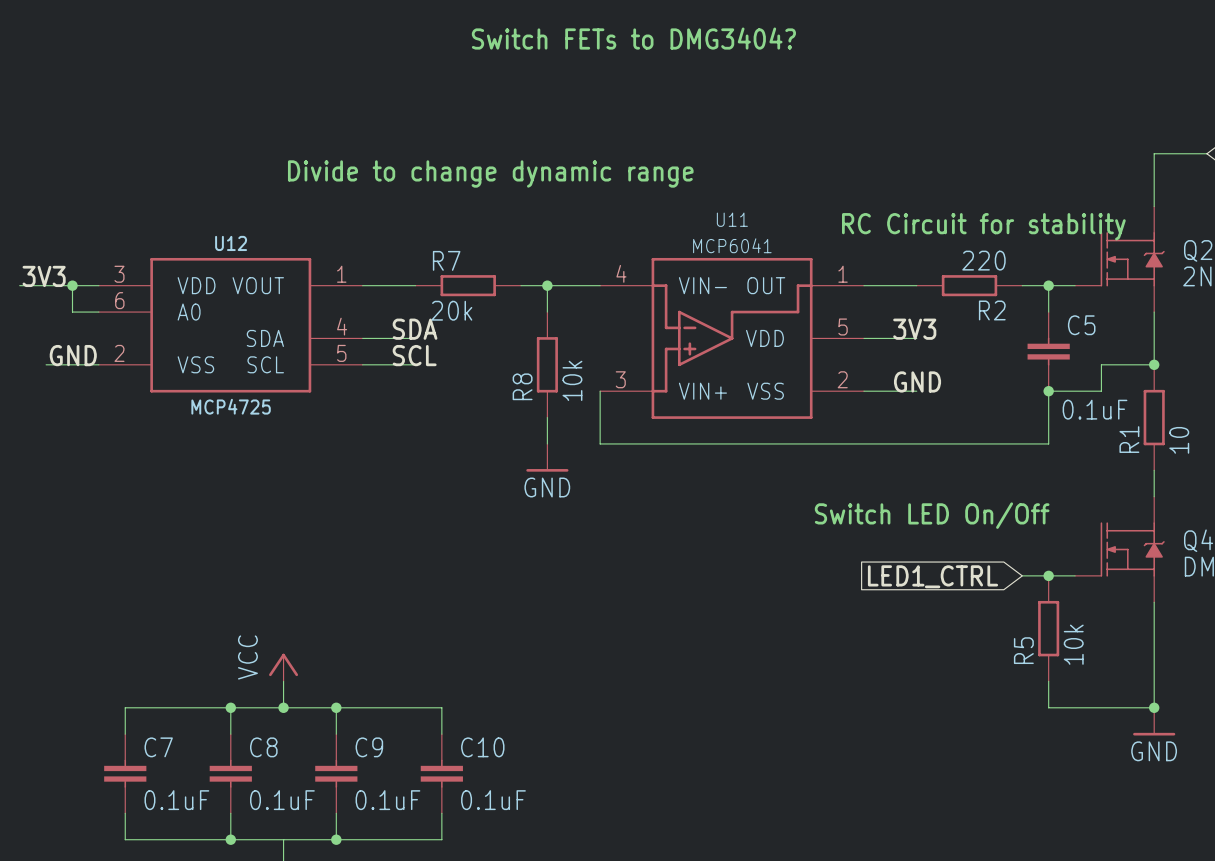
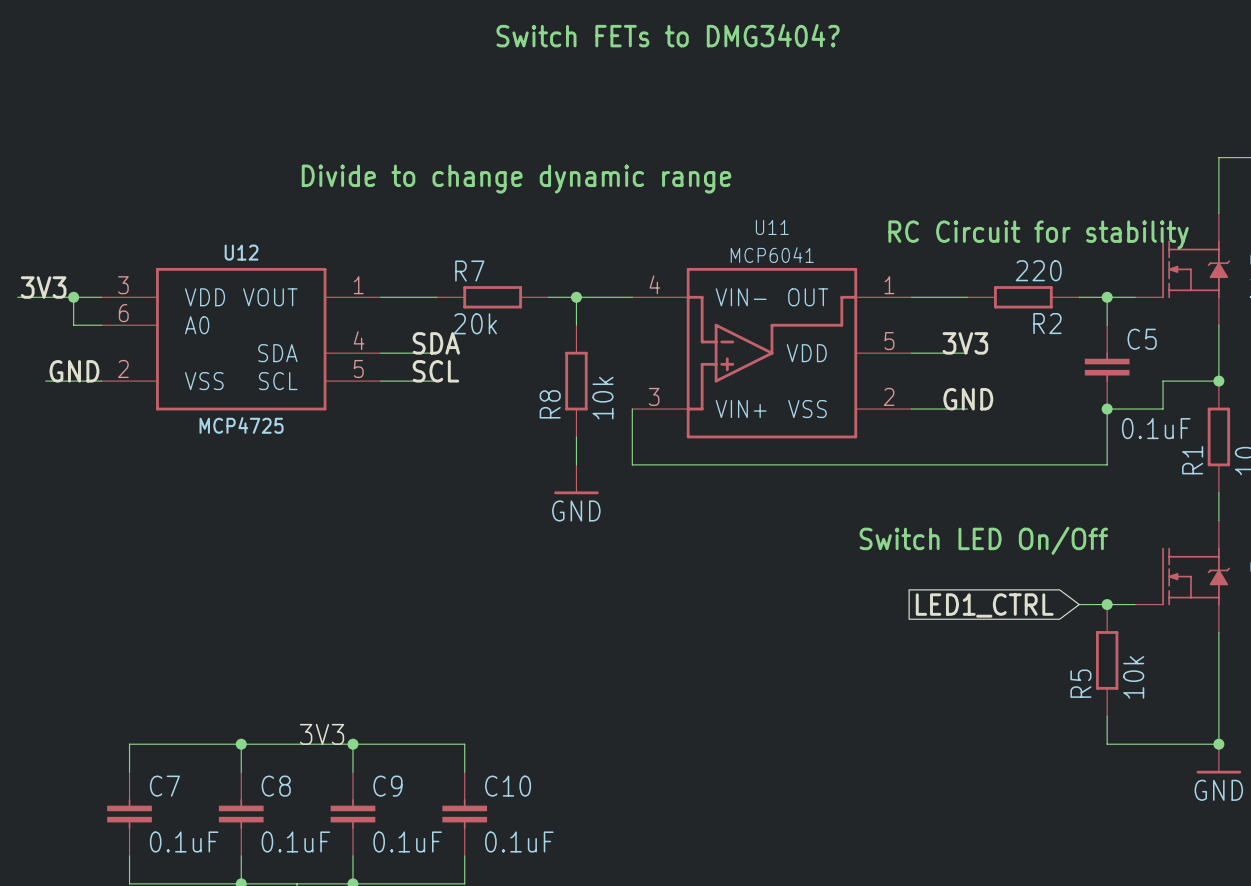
power symbol: VCC (283, 667) -> none
wire: (283, 681) (283, 707) -> none
label: none -> 3V3 (322, 734)
junction: (283, 707) -> none

